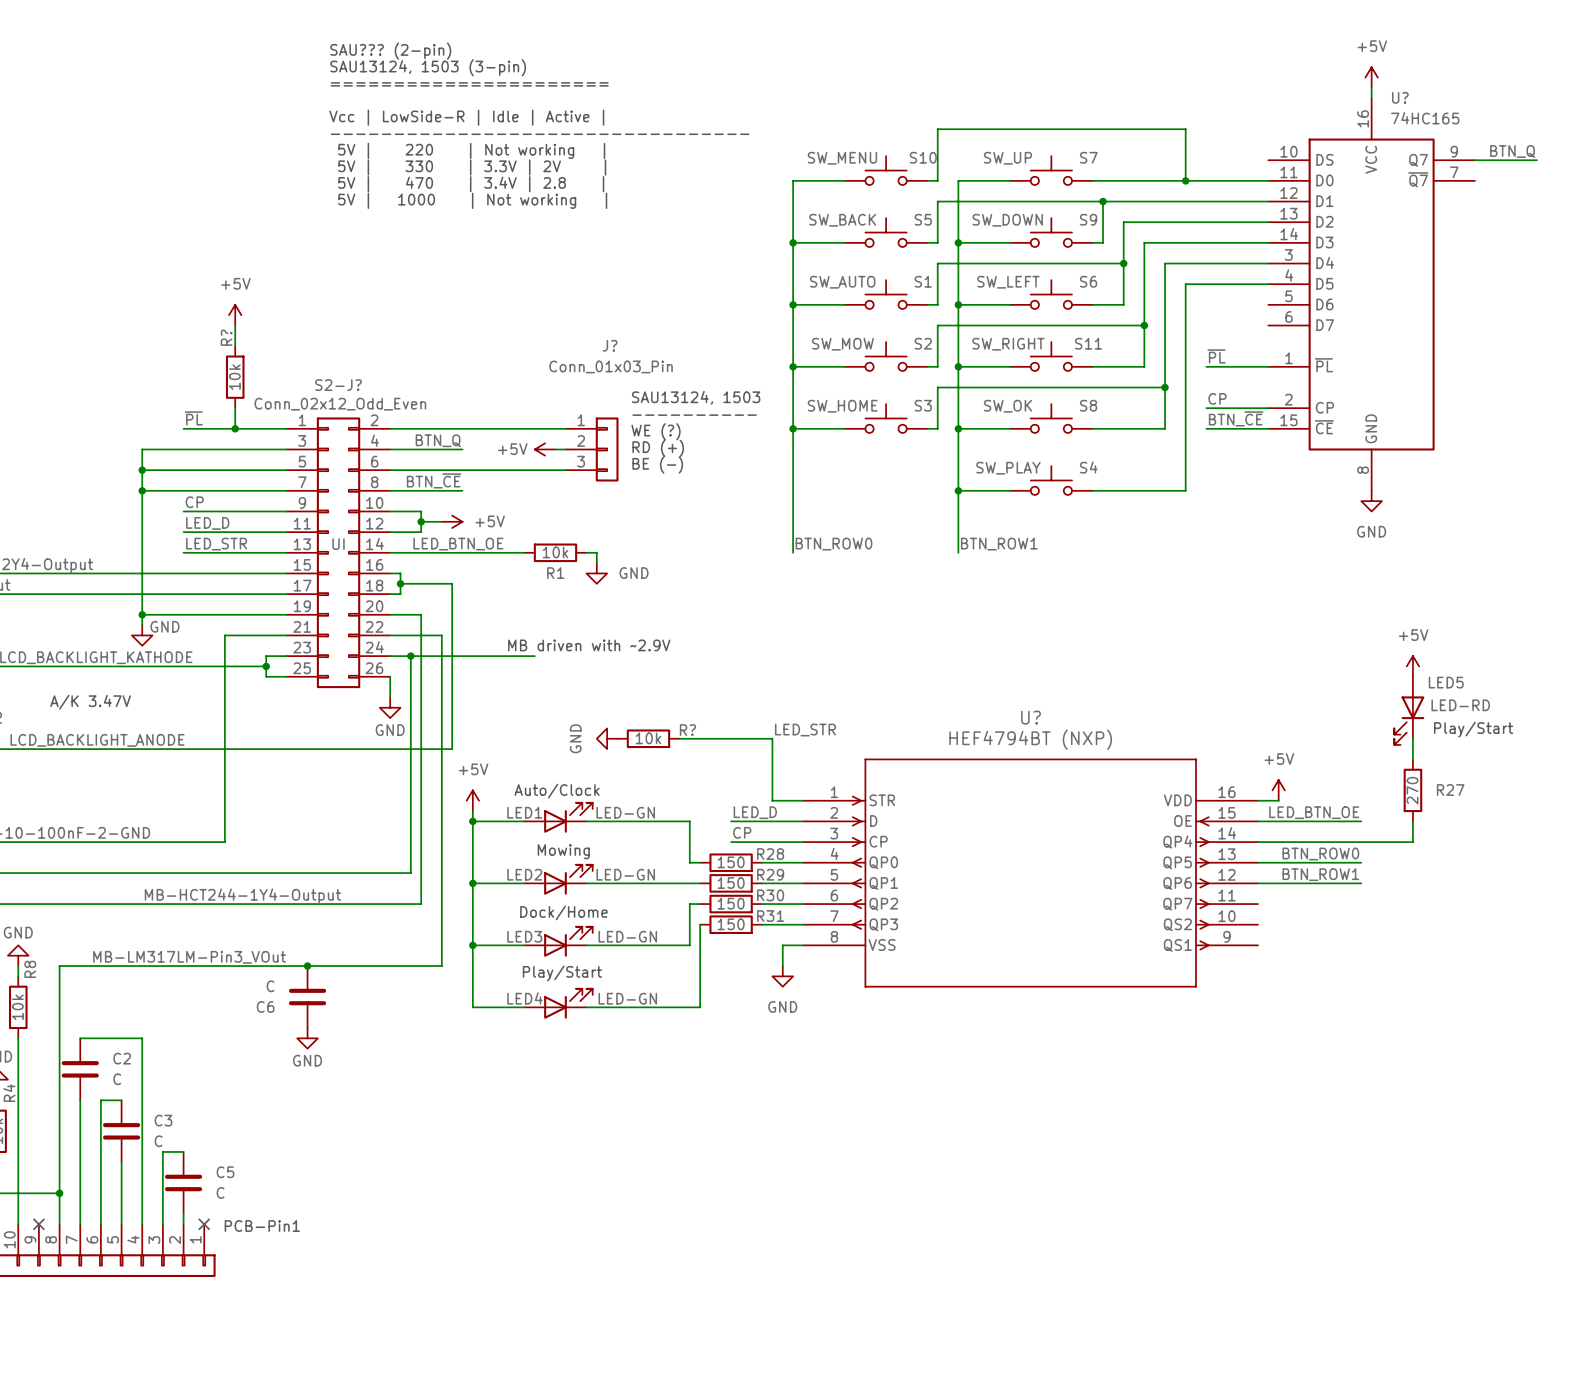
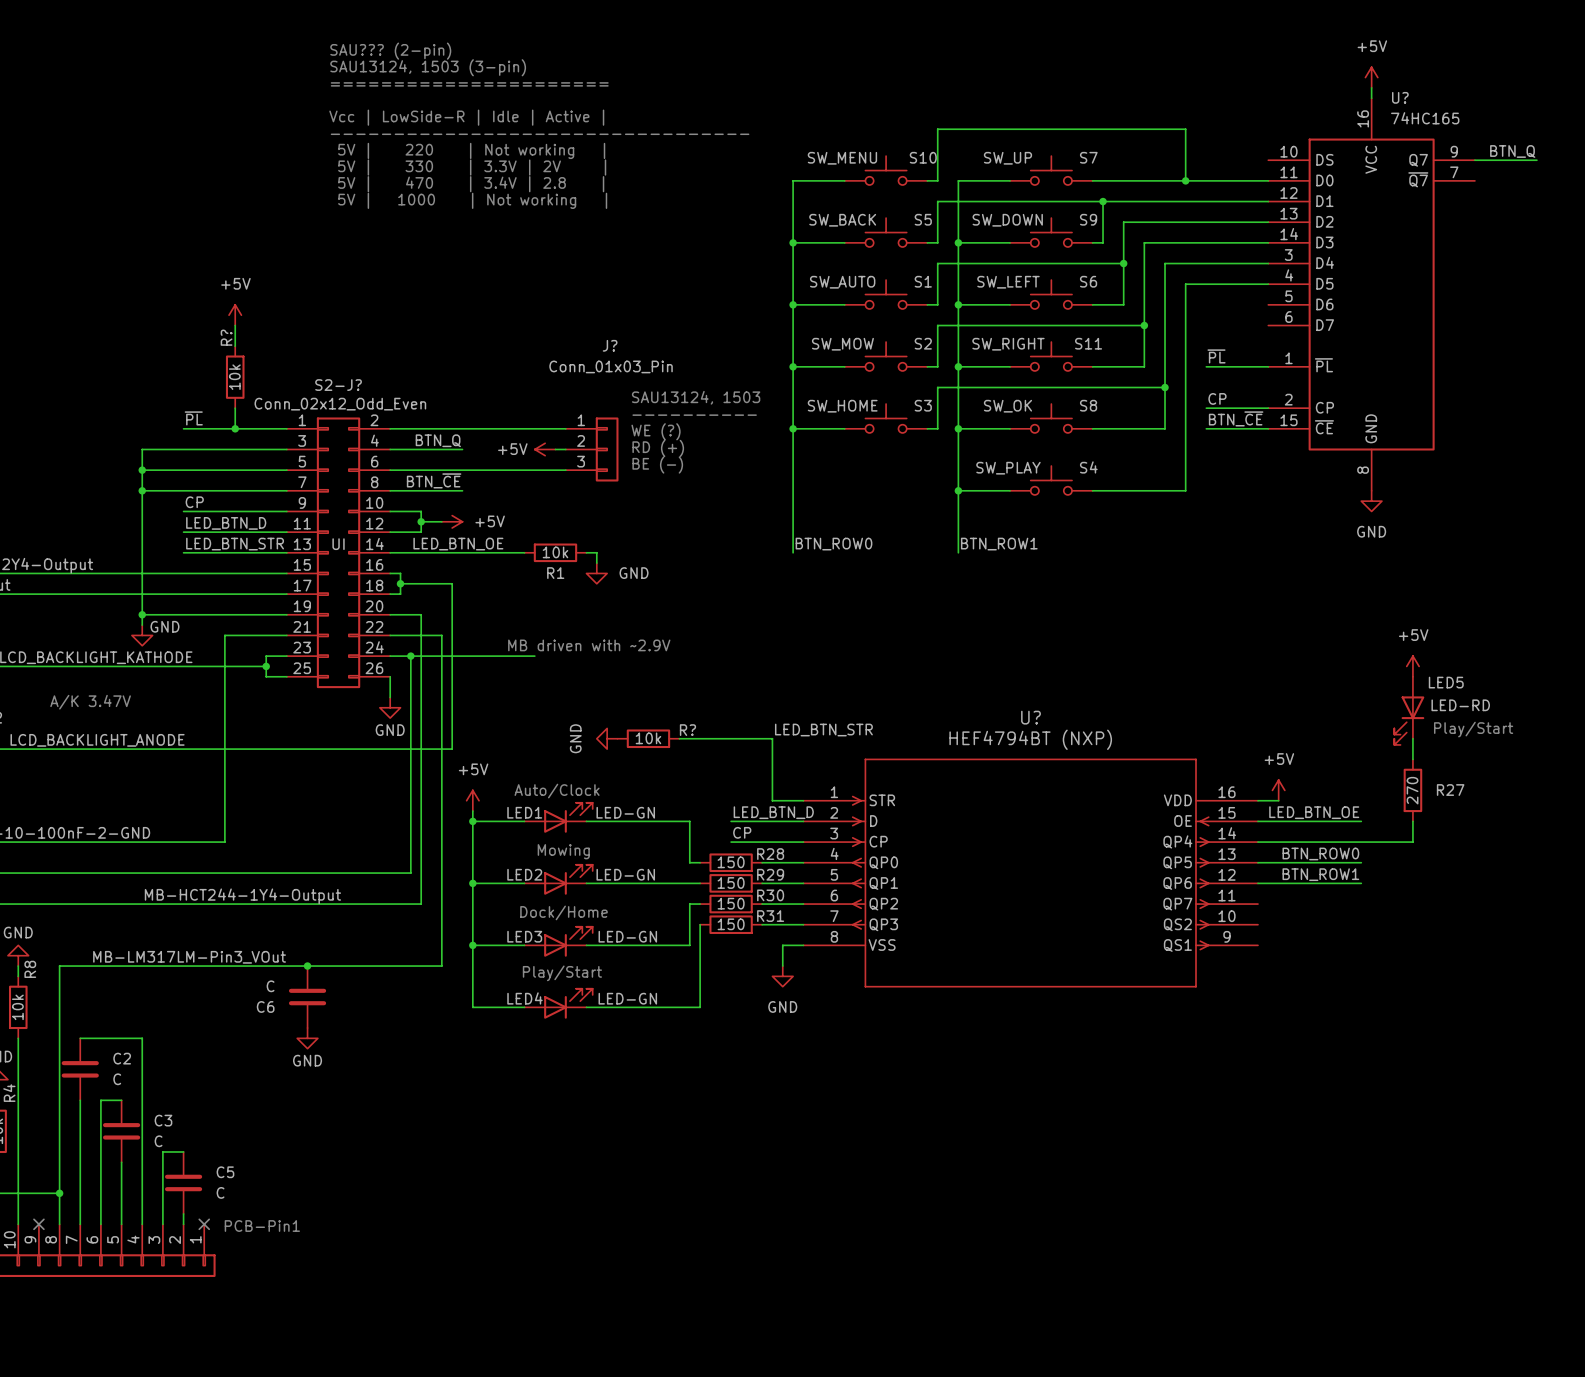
label: LED_D (207, 523) -> LED_BTN_D (226, 523)
label: LED_STR (216, 544) -> LED_BTN_STR (235, 544)
label: LED_STR (805, 730) -> LED_BTN_STR (823, 730)
label: LED_D (755, 812) -> LED_BTN_D (773, 812)

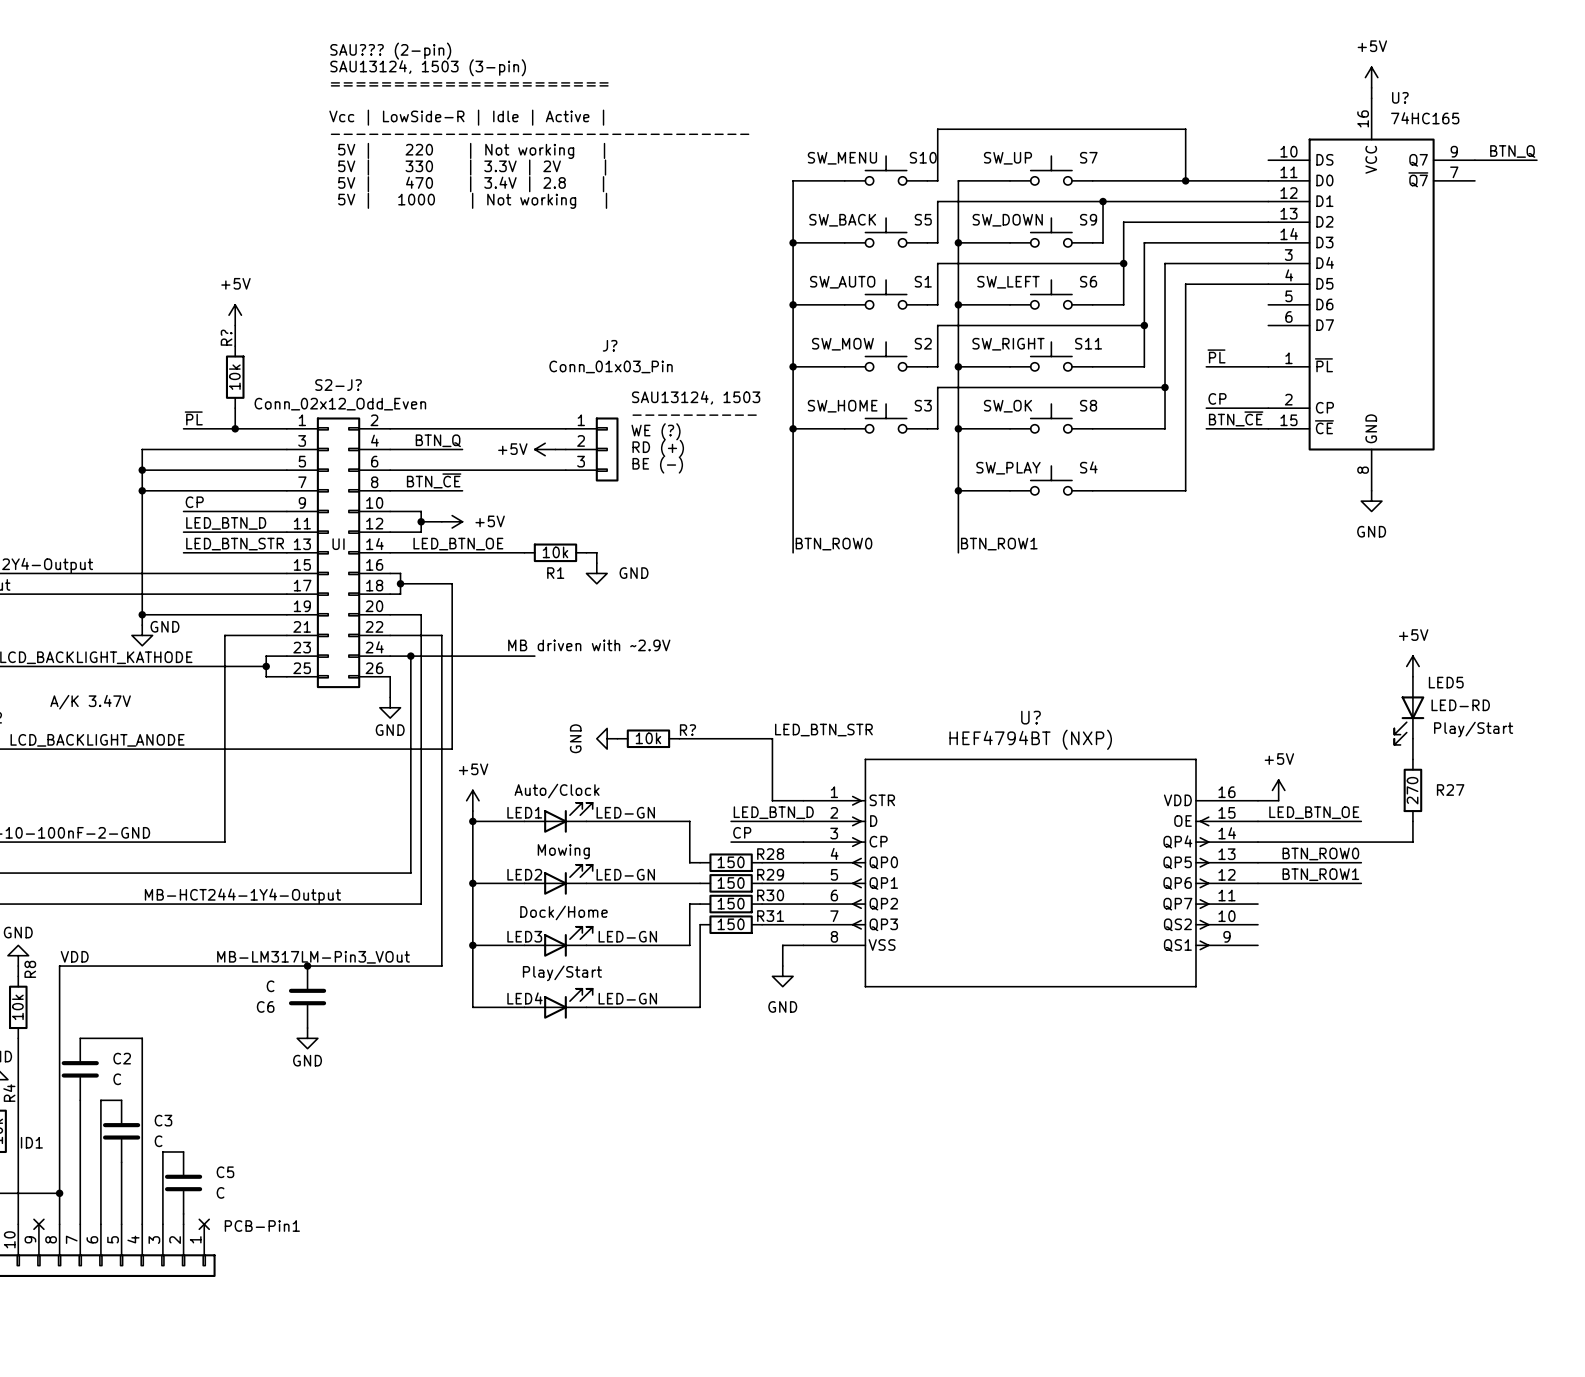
label: none -> VDD (74, 956)
label position: MB-LM317LM-Pin3_VOut (189, 957) -> MB-LM317LM-Pin3_VOut (313, 957)
label: none -> ID1 (31, 1142)

